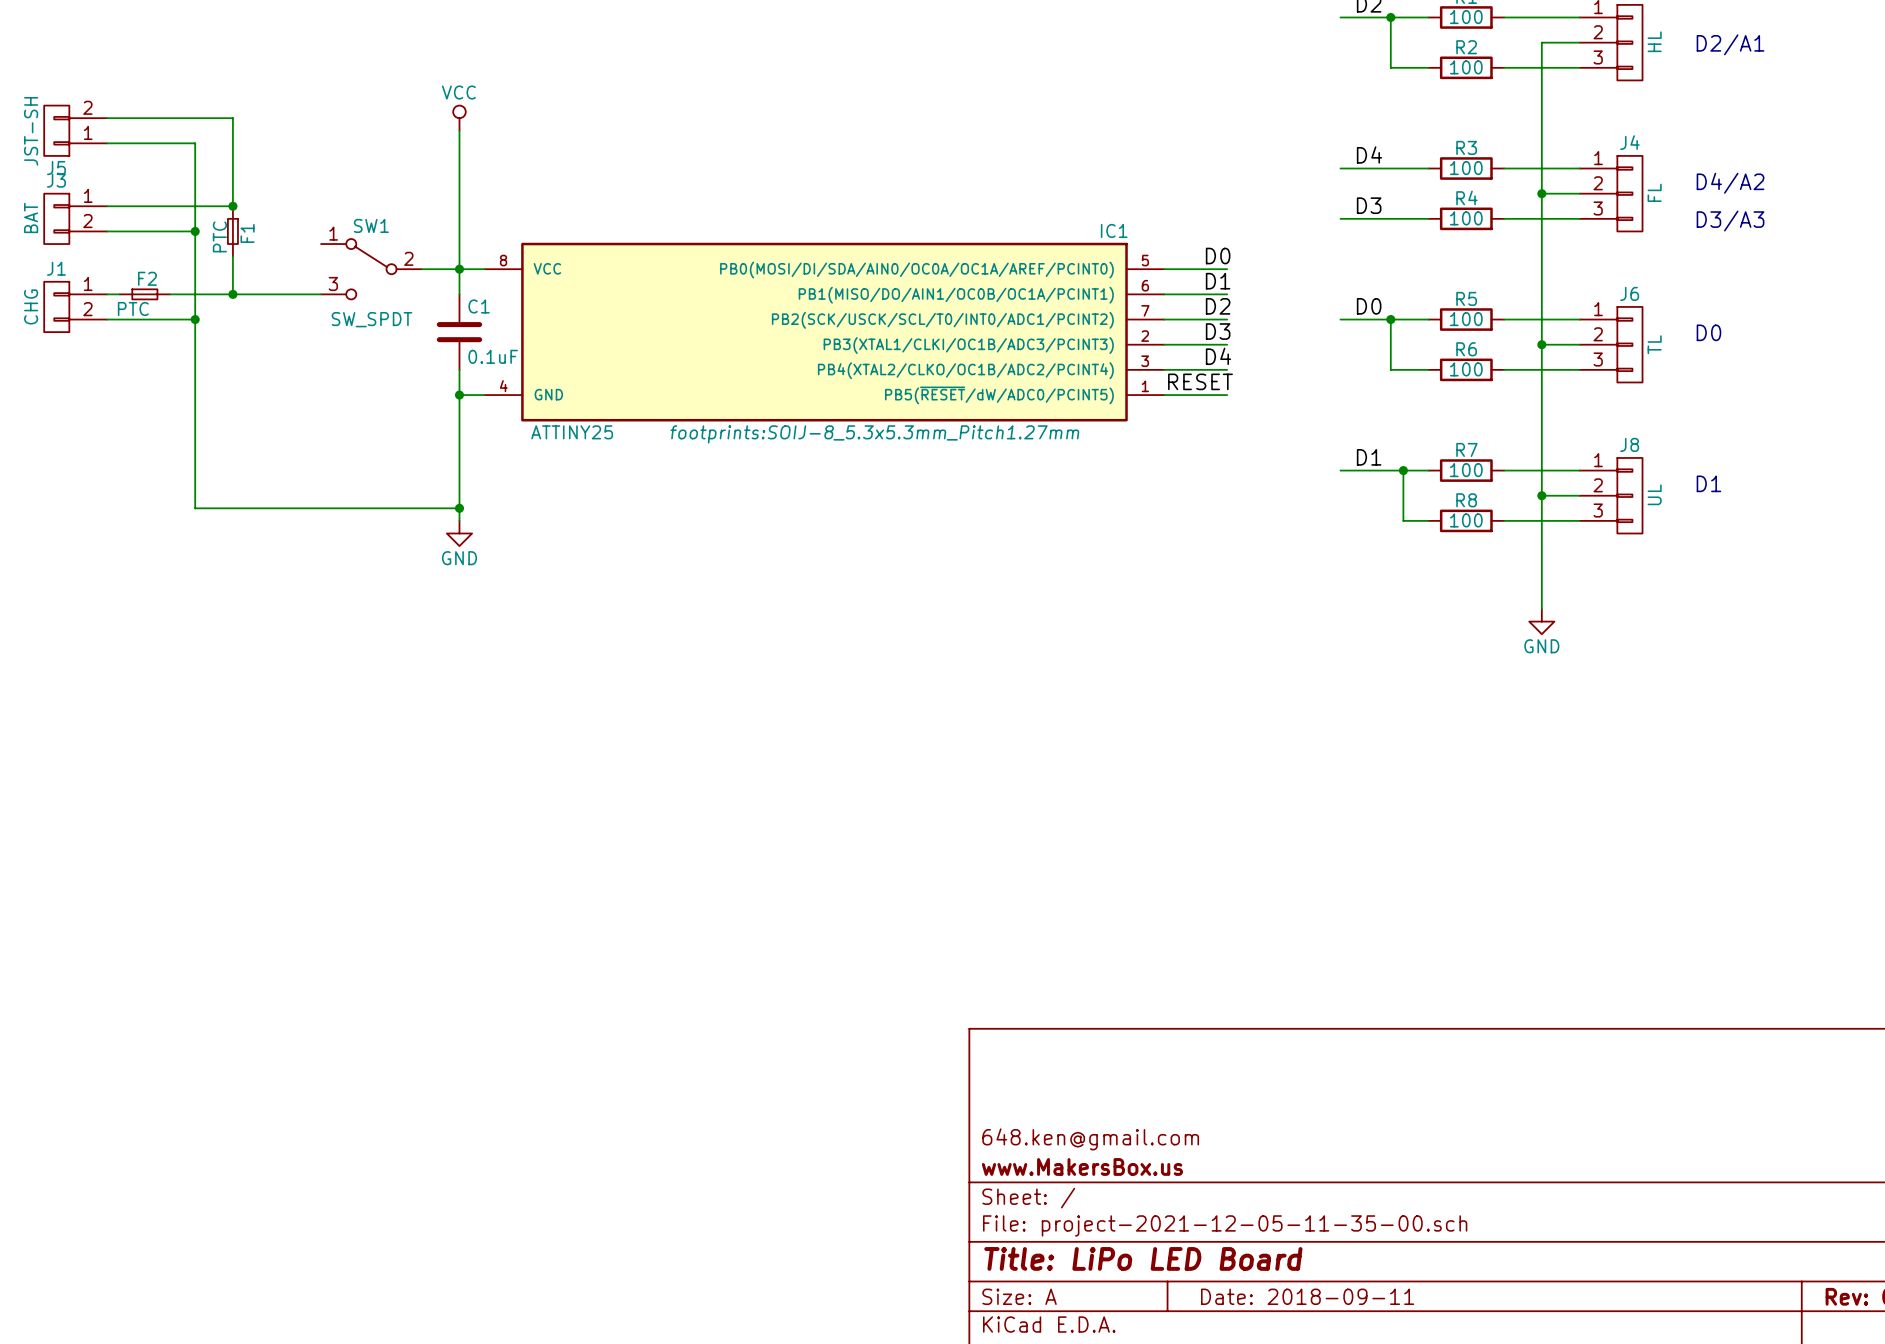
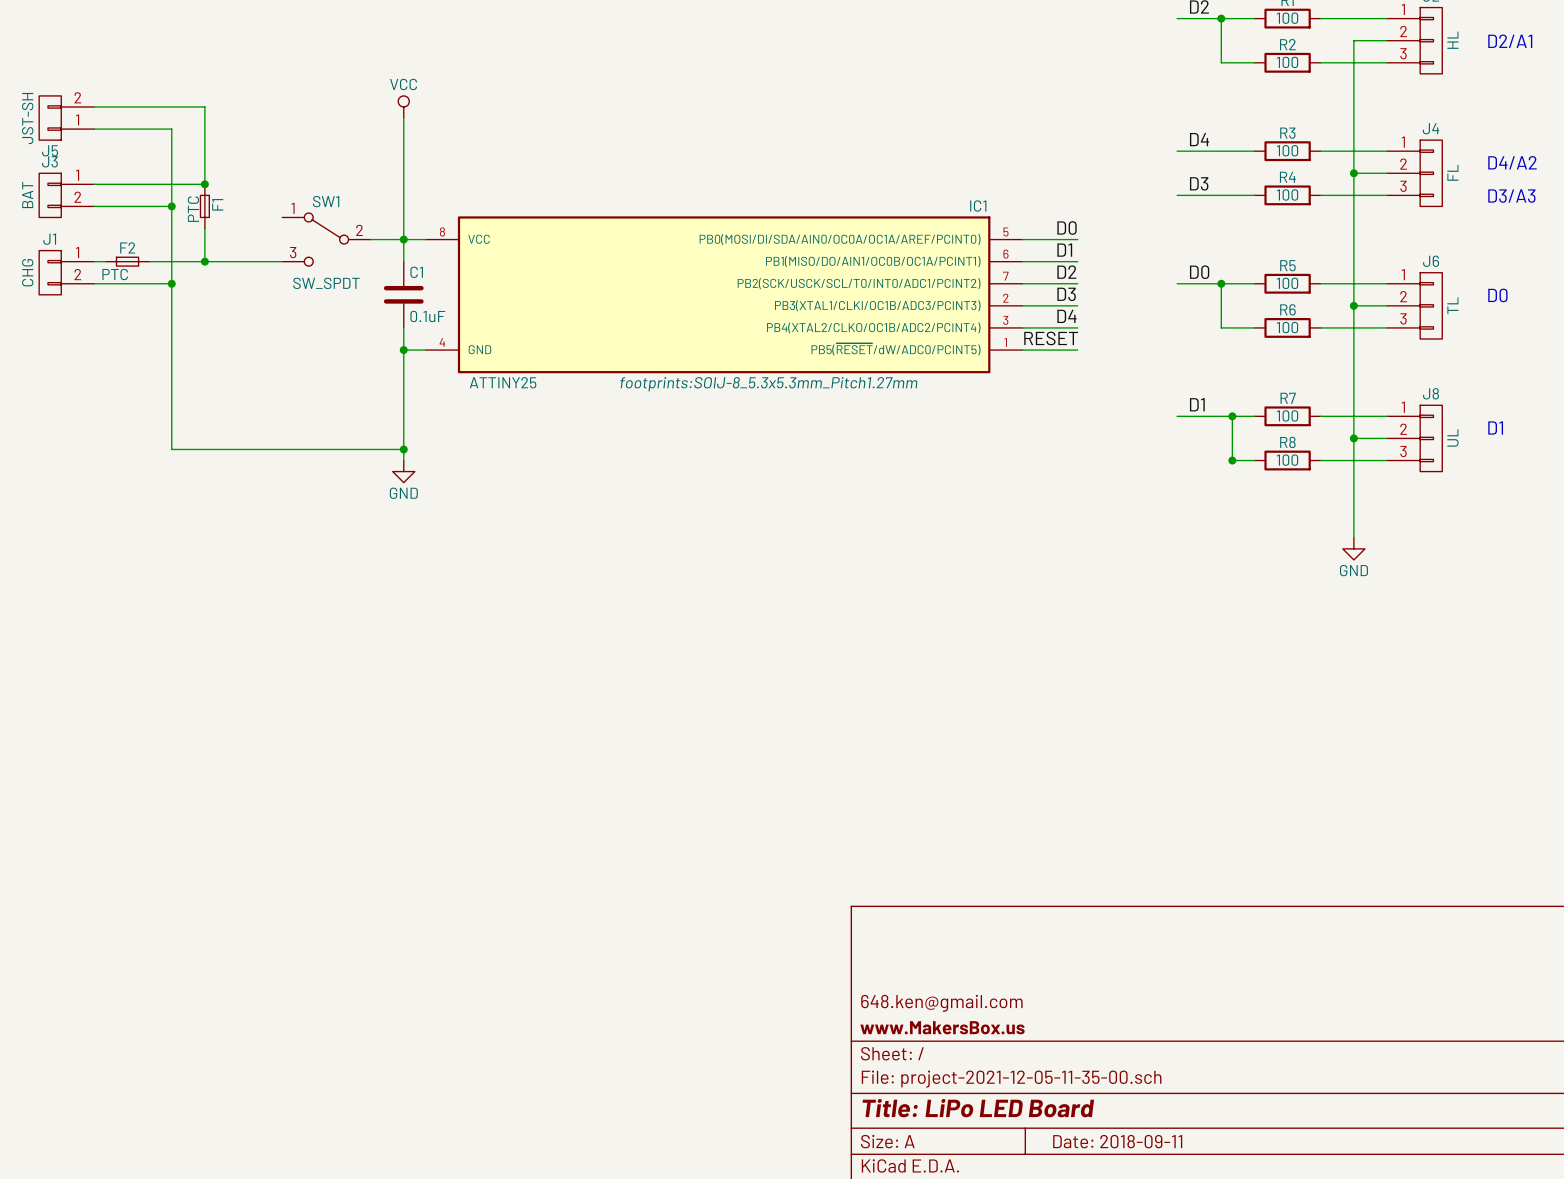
junction: none -> (1232, 460)

